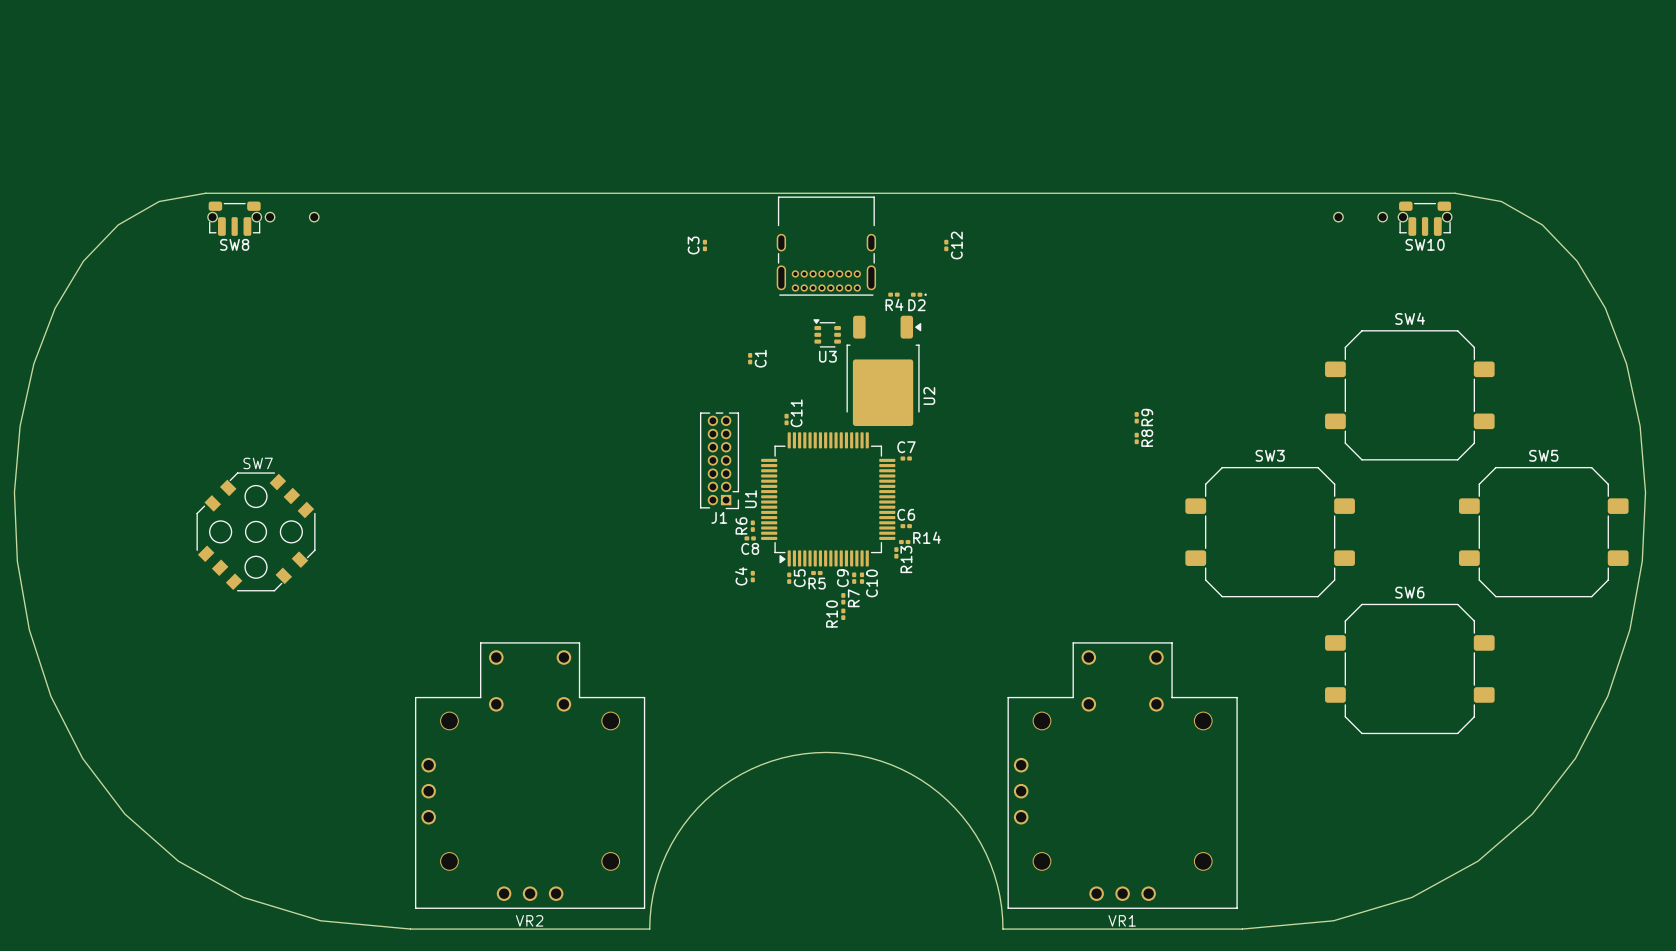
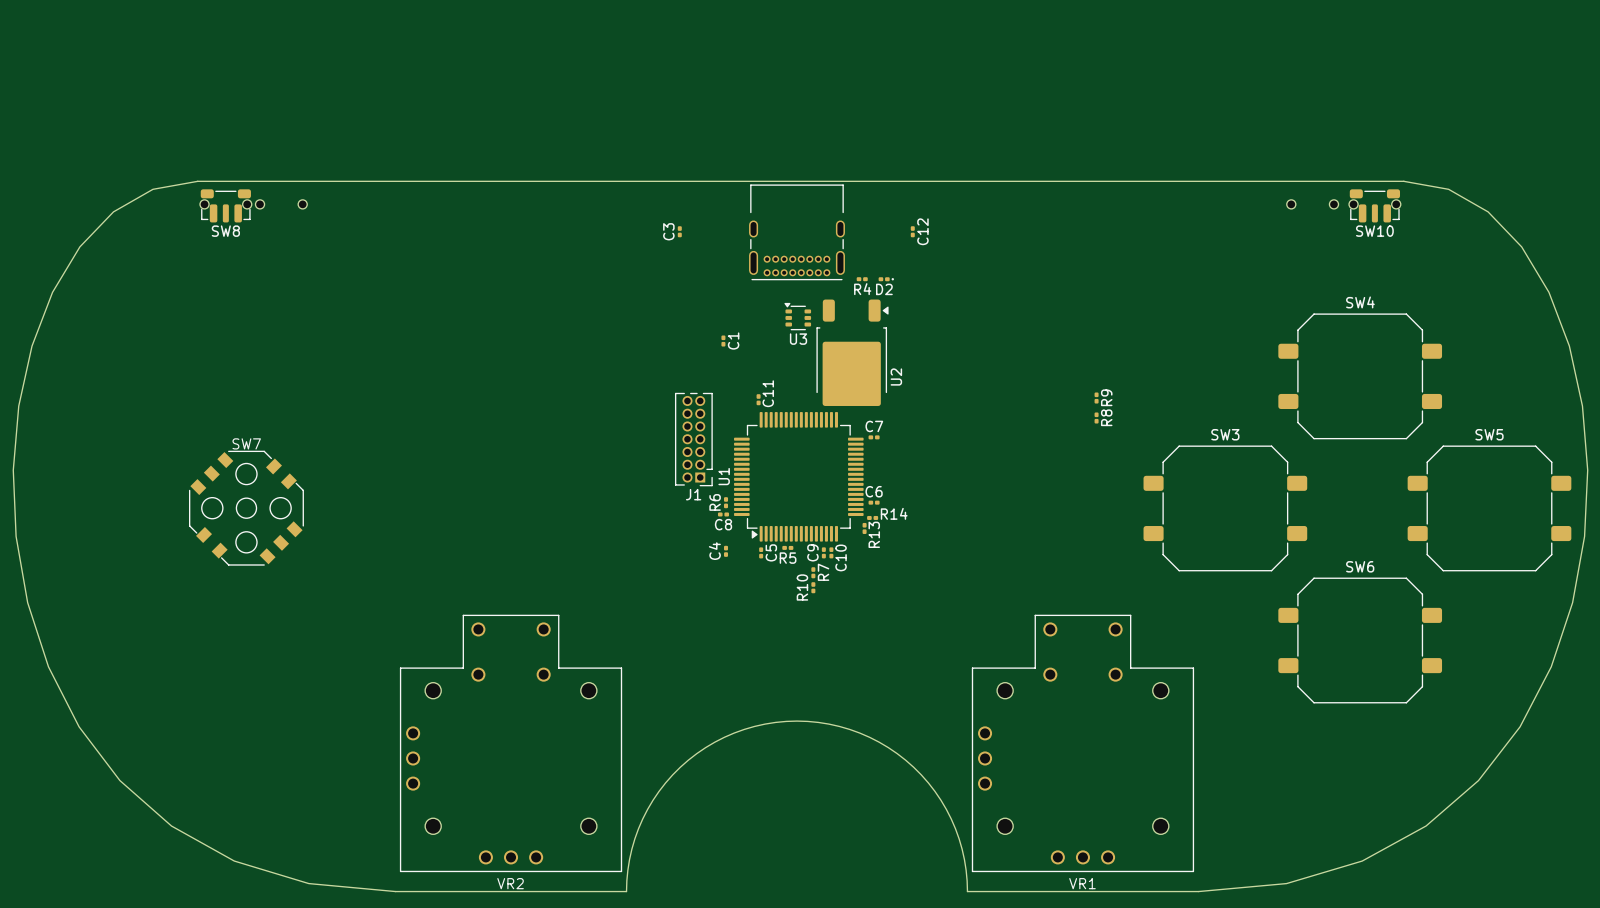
SW7 rotation: 0° (256, 531) -> 90° clockwise (246, 508)
VR2 footprint: [415, 642, 646, 909] -> [400, 614, 623, 872]
VR1 footprint: [1007, 642, 1238, 909] -> [971, 614, 1194, 872]

